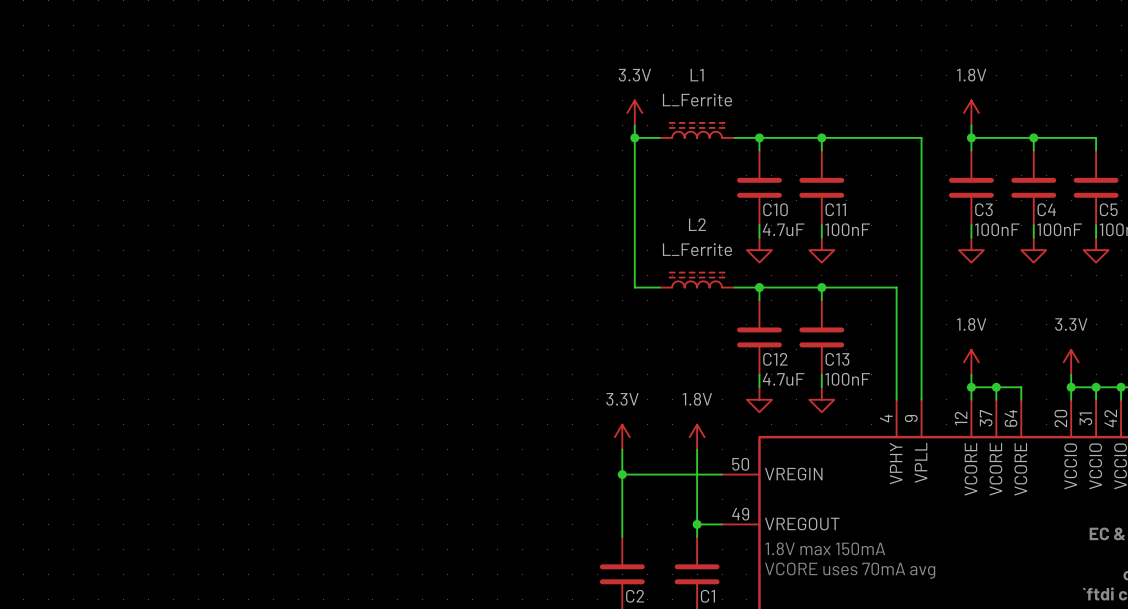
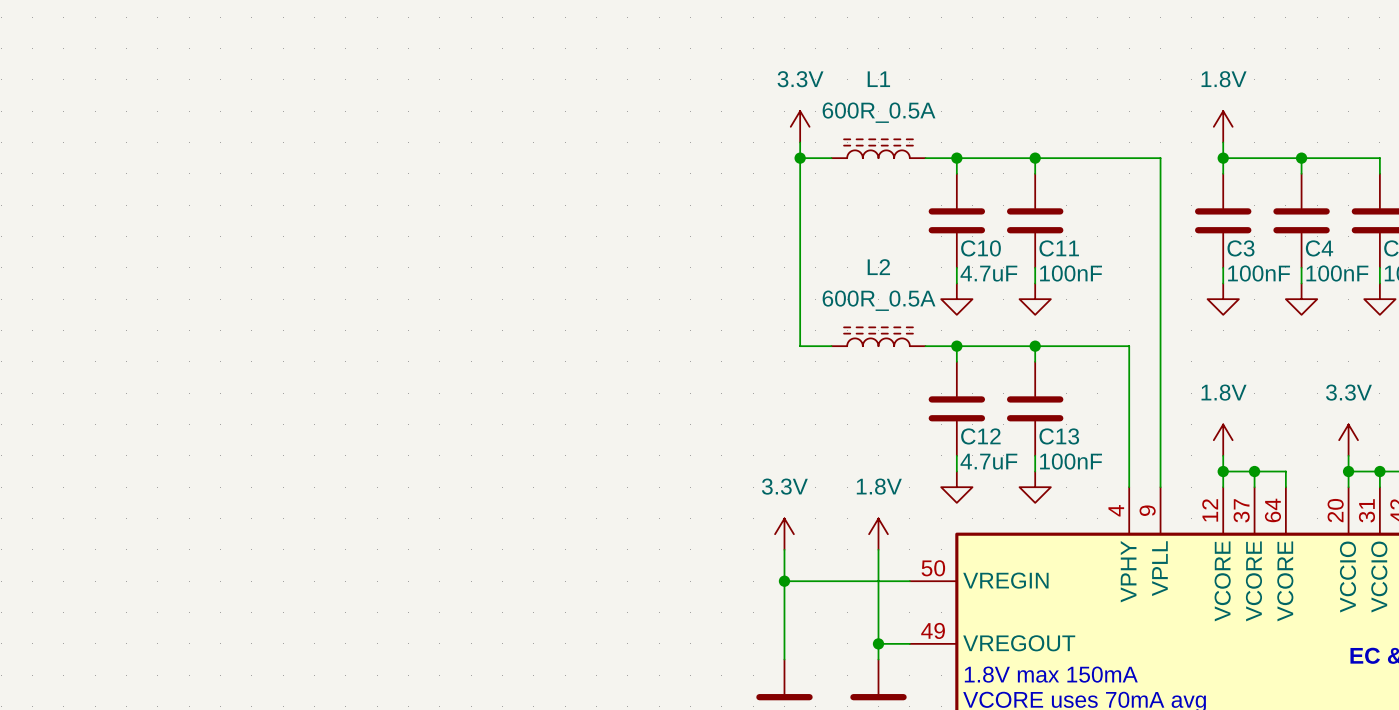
L1 value: L_Ferrite (697, 100) -> 600R_0.5A (879, 112)
L2 value: L_Ferrite (697, 249) -> 600R_0.5A (879, 300)

